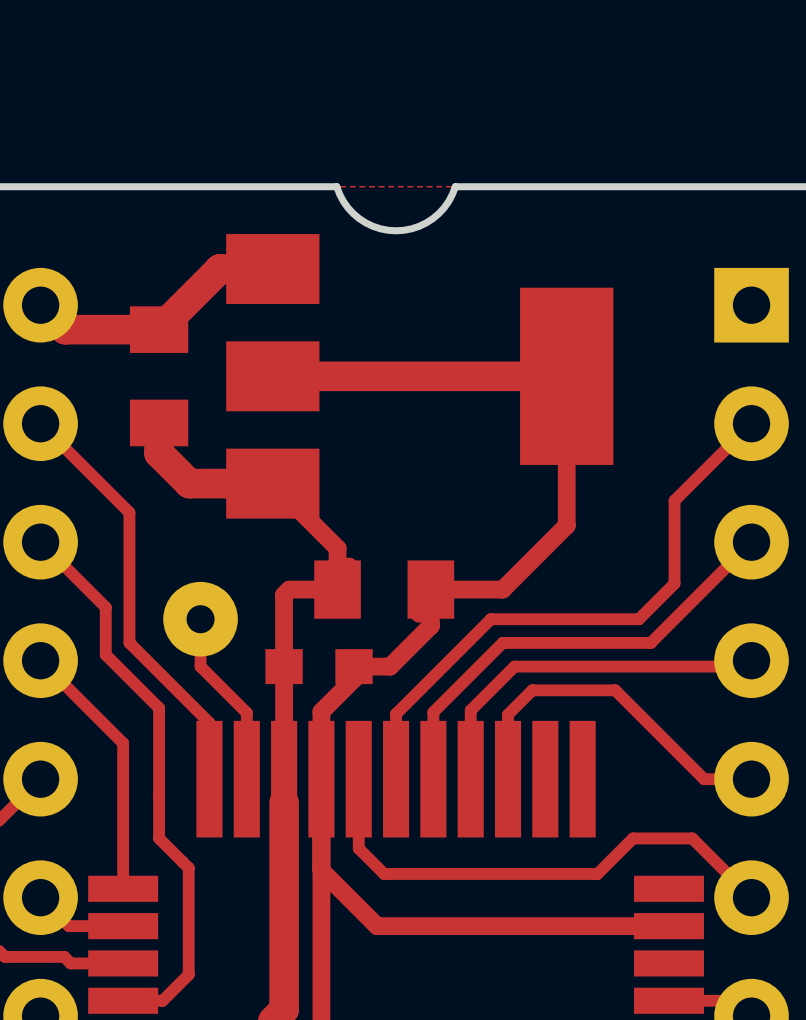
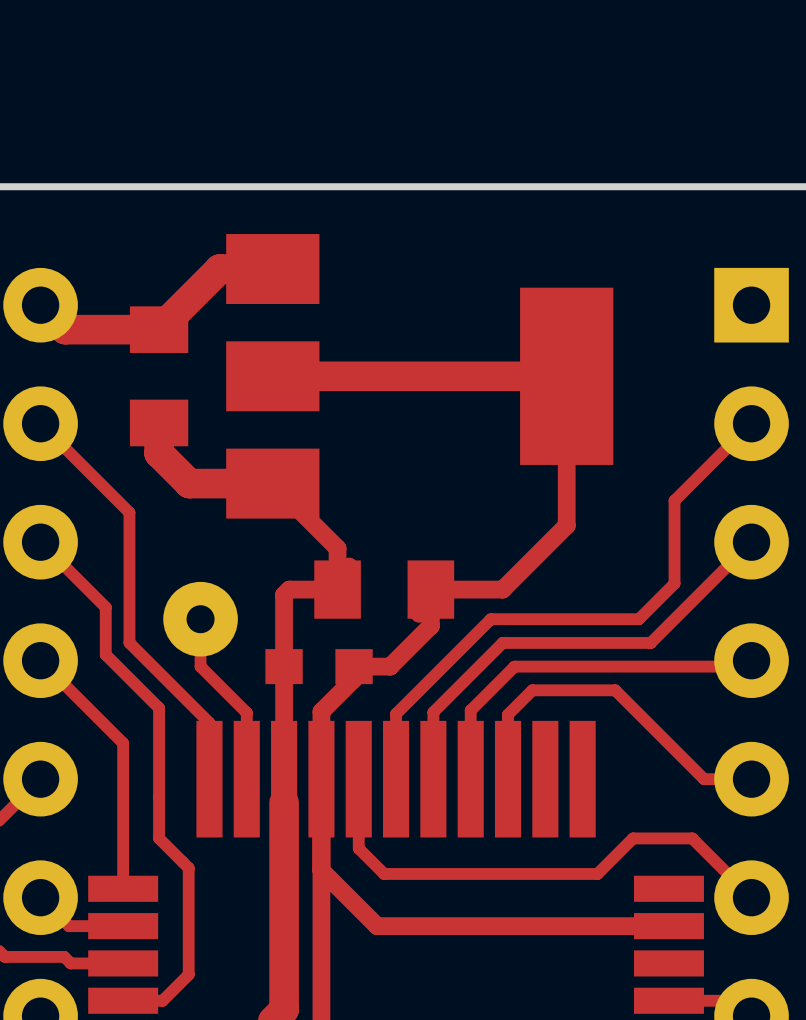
board edge: (455, 186) (444, 207) (432, 218) (411, 228) (396, 230) (372, 226) (359, 218) (343, 201) (336, 186) -> (455, 186) (336, 186)

